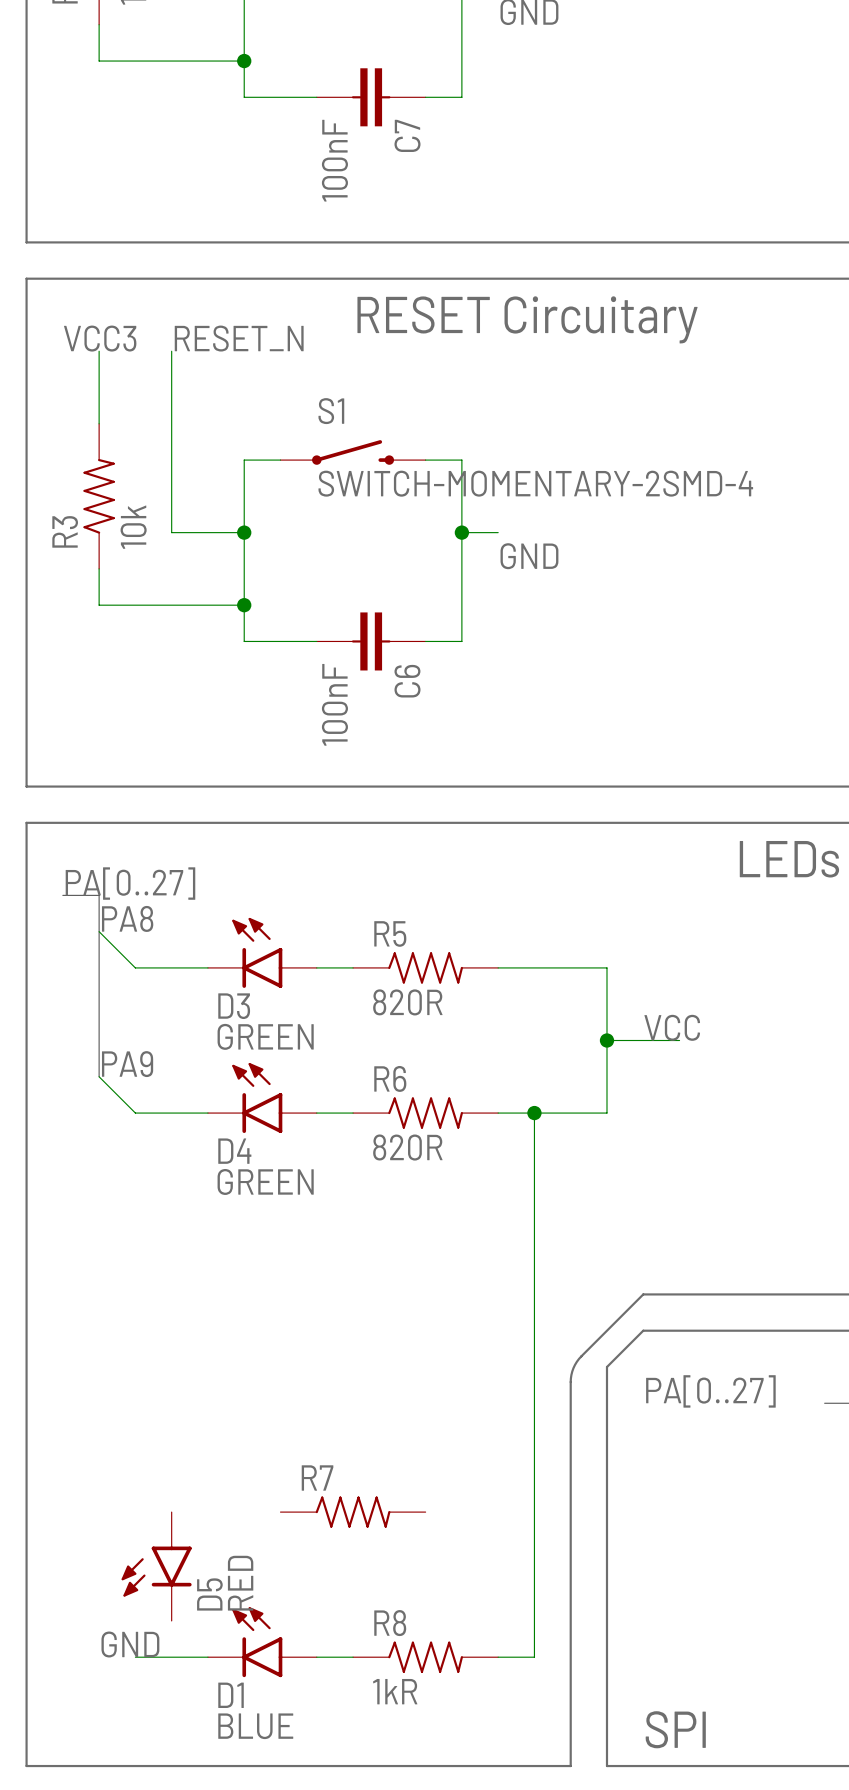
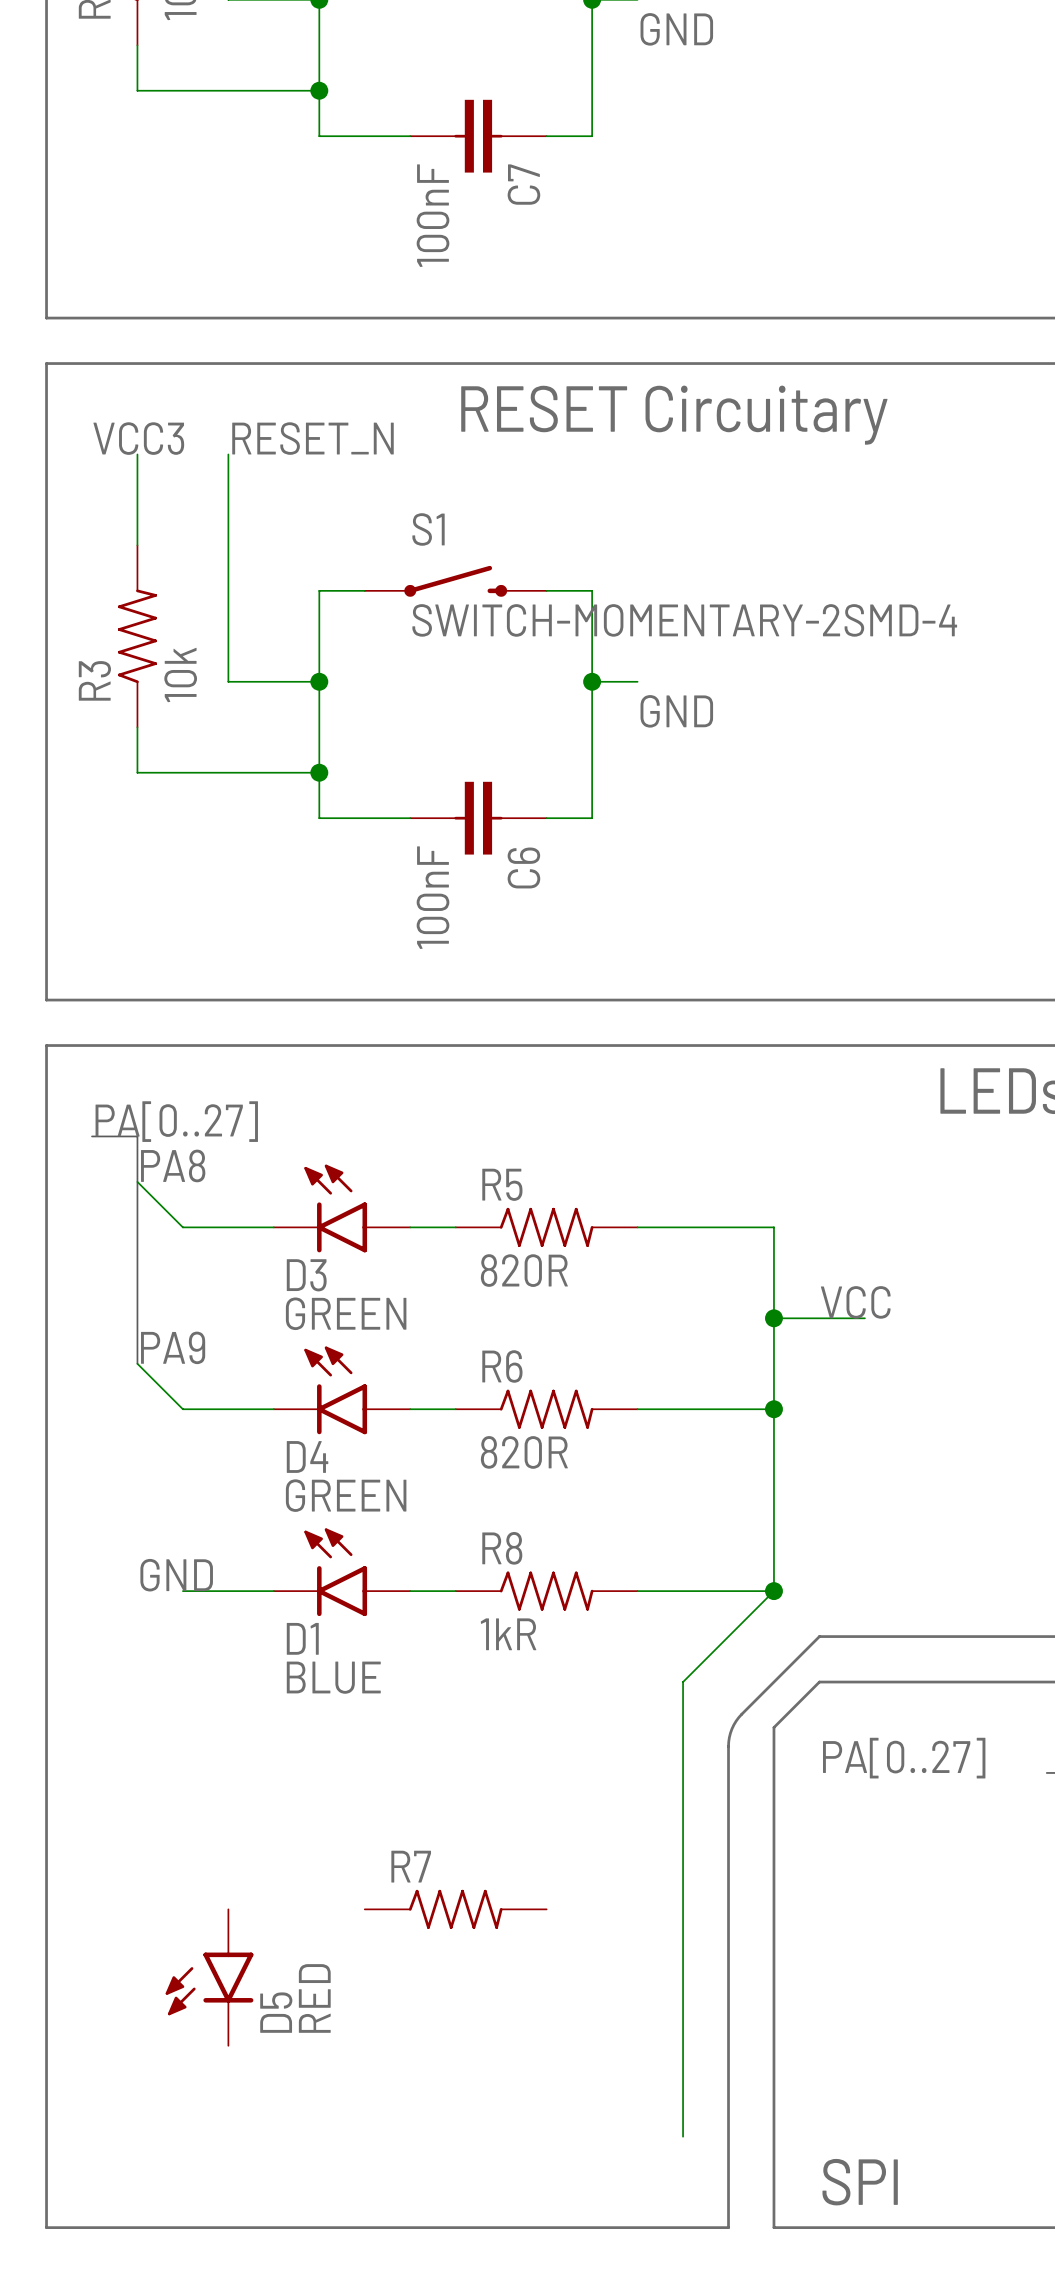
wire: (534, 1113) (534, 1330) -> (773, 1591) (683, 1682)
junction position: (534, 1113) -> (773, 1409)
wire: none -> (773, 1409) (773, 1591)
label: none -> GND (176, 1575)
wire: none -> (182, 1591) (273, 1591)
wire: none -> (410, 1591) (455, 1591)
wire: none -> (637, 1591) (773, 1591)
junction: none -> (773, 1591)
D1 position: (262, 1642) -> (342, 1572)
label: GND (130, 1644) -> none
wire: (135, 1657) (207, 1657) -> none
wire: (316, 1657) (353, 1657) -> none
R8 position: (425, 1657) -> (546, 1591)
wire: (498, 1657) (534, 1657) -> (683, 2136) (683, 2091)

